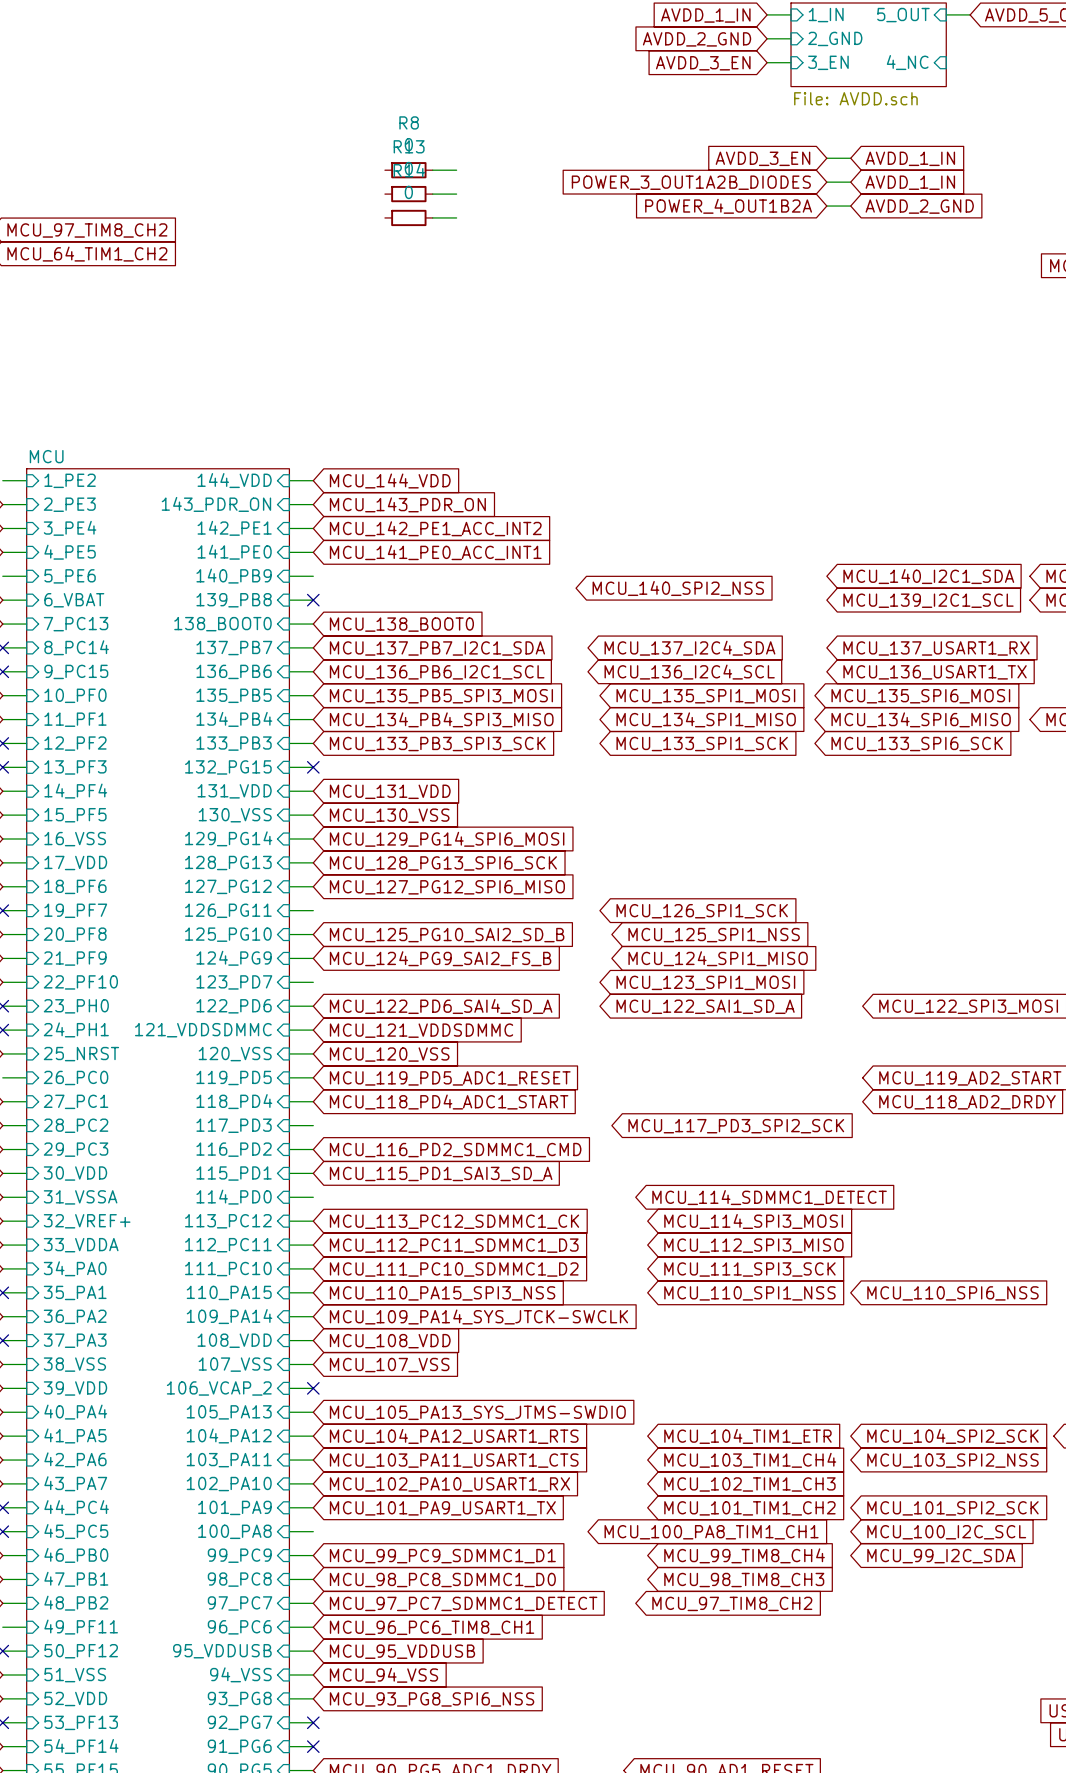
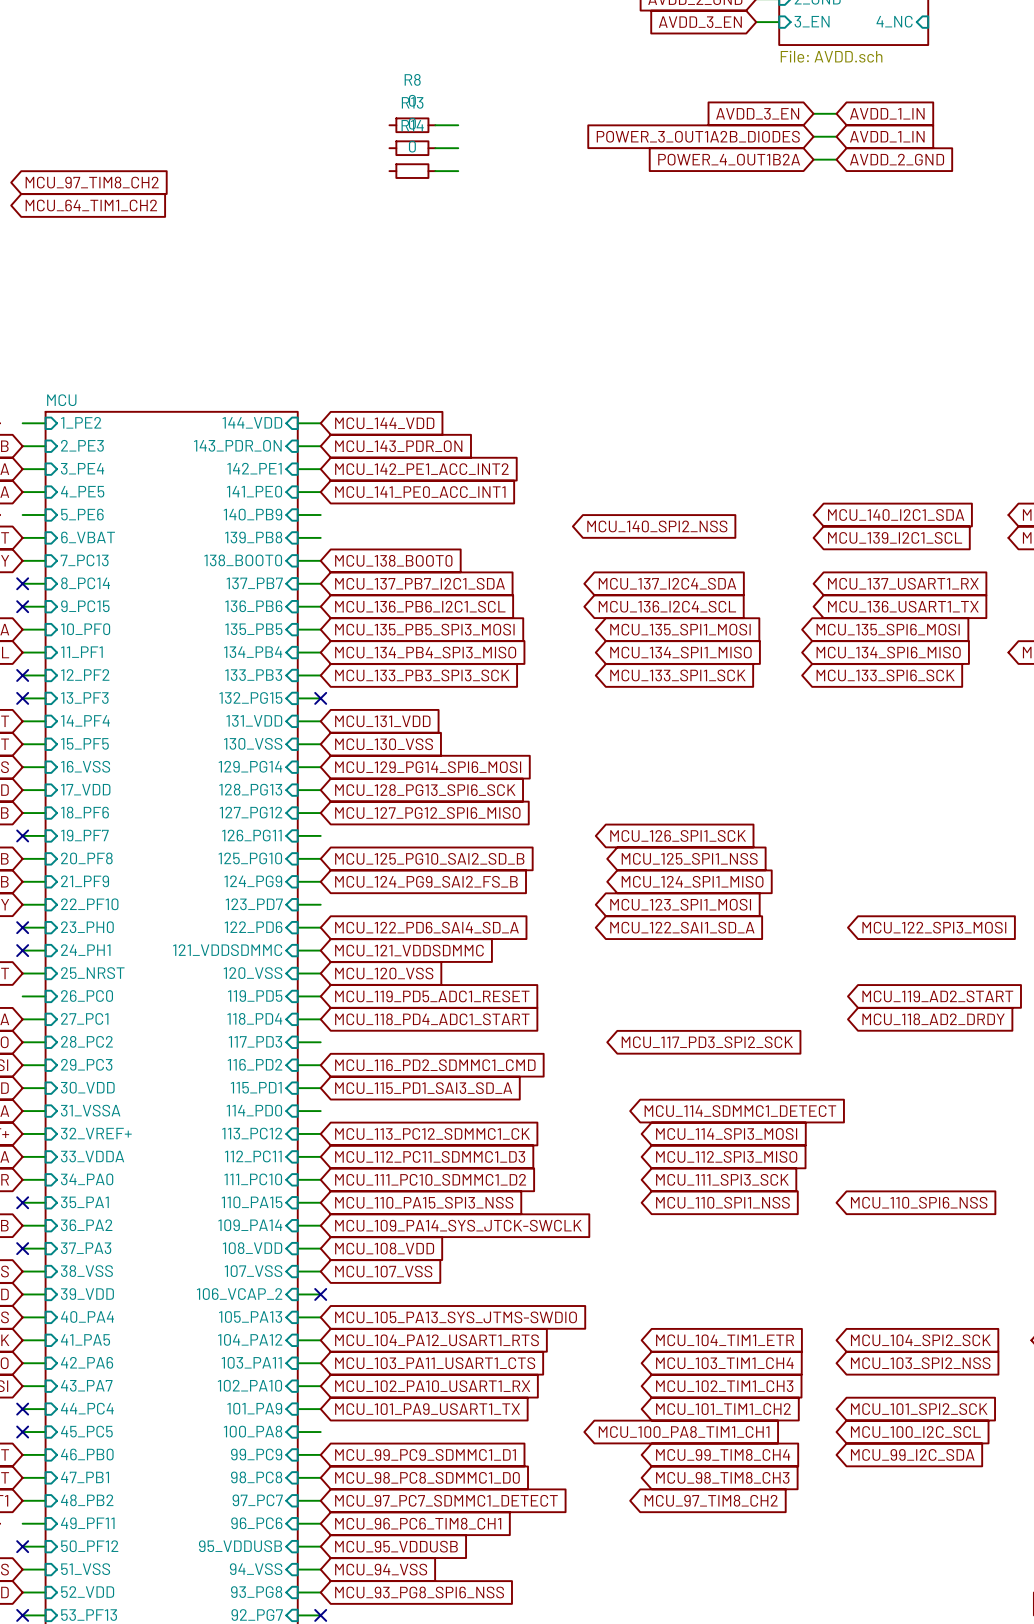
no-connect mark: (313, 600) -> none

